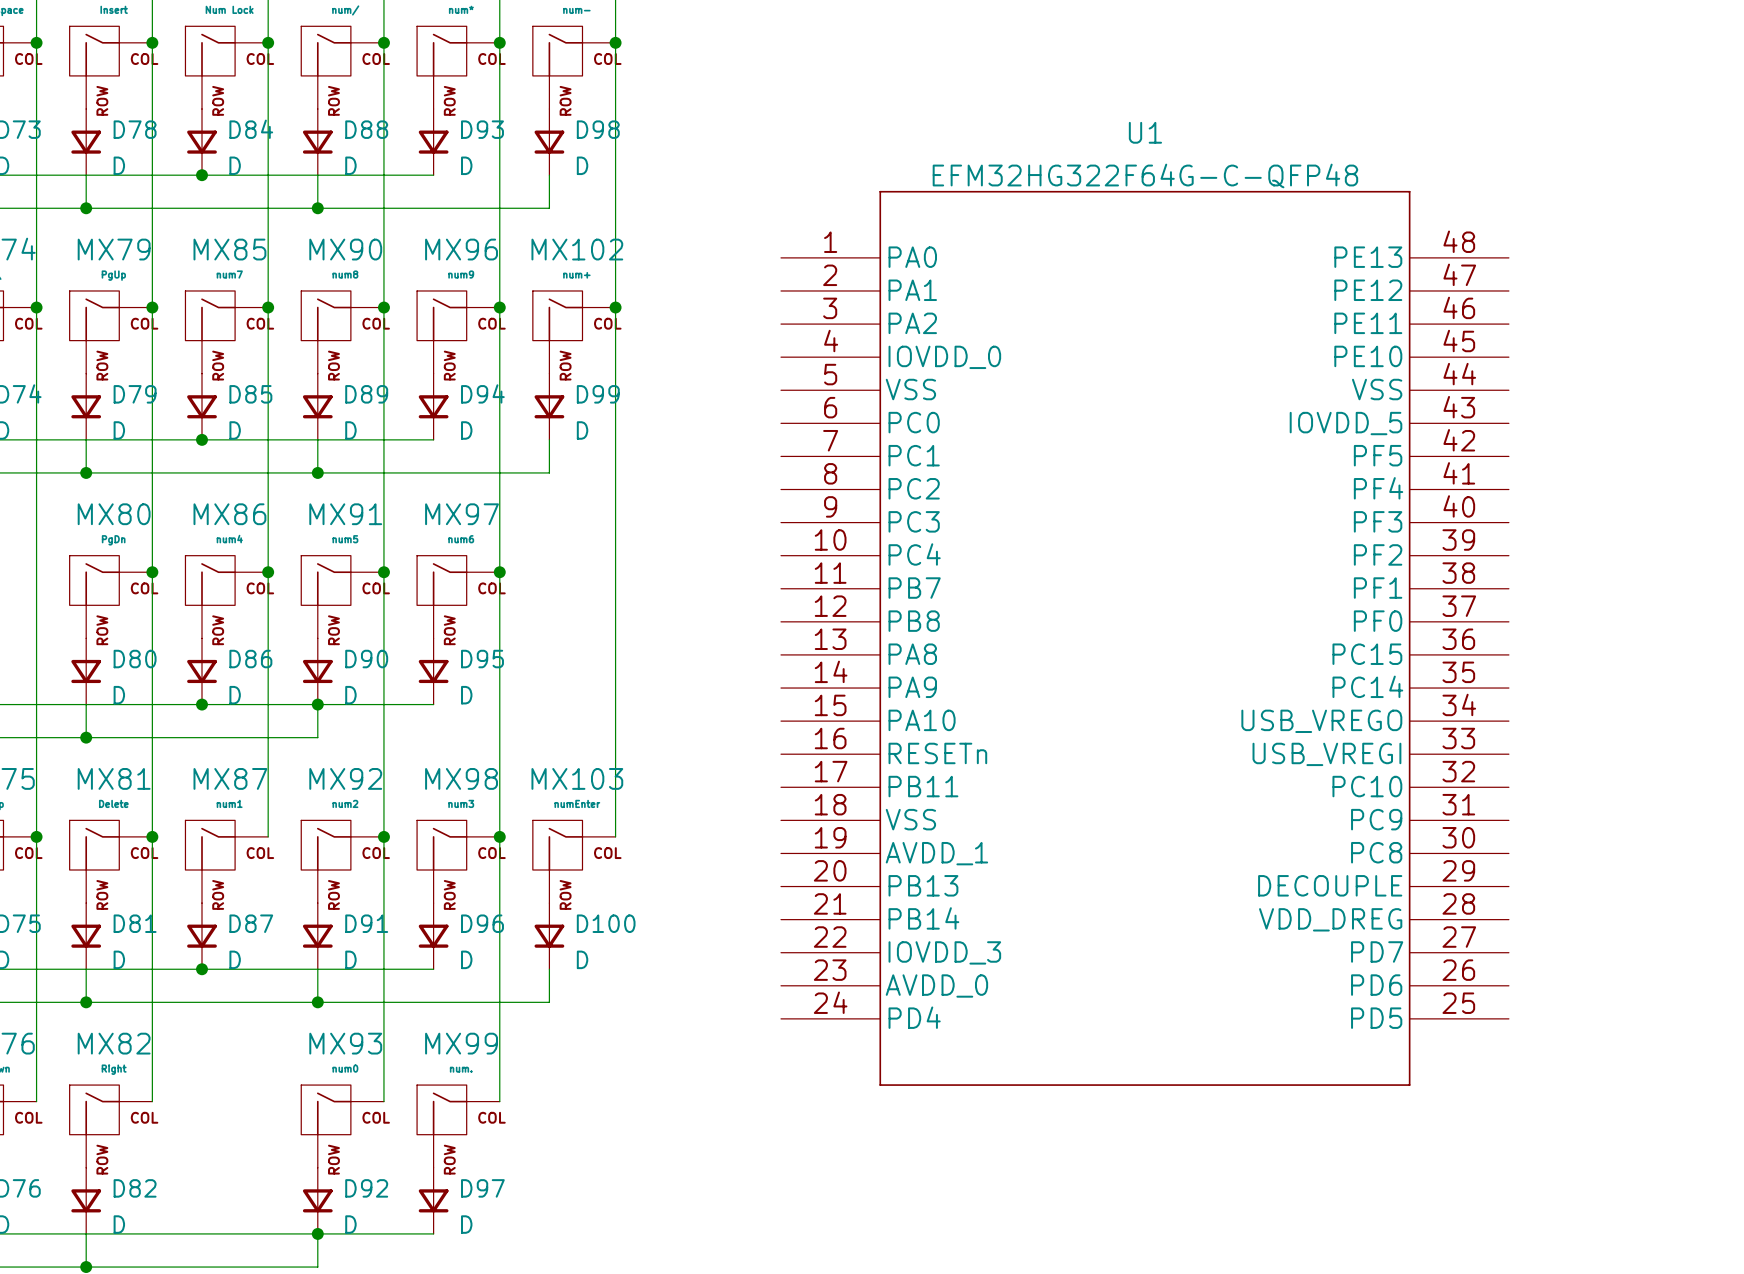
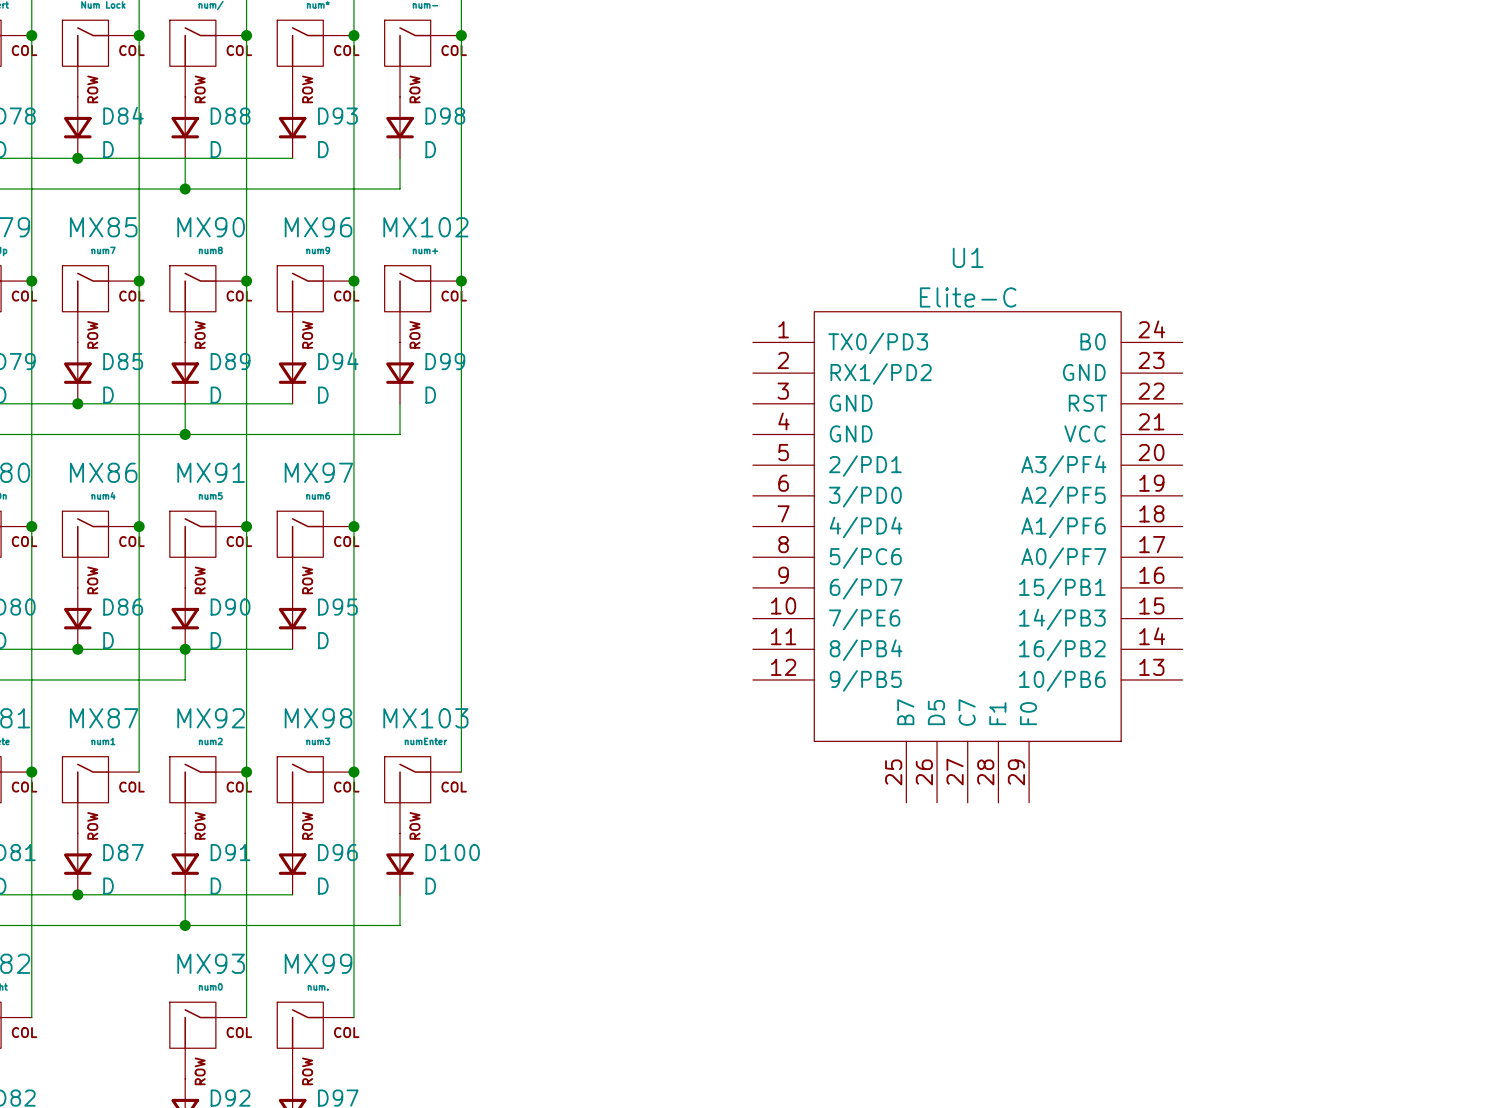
U1 name position: U1 (1145, 132) -> U1 (968, 257)
U1 value: EFM32HG322F64G-C-QFP48 (1145, 175) -> Elite-C (968, 297)
U1 symbol: [781, 190, 1509, 1086] -> [752, 311, 1183, 803]

